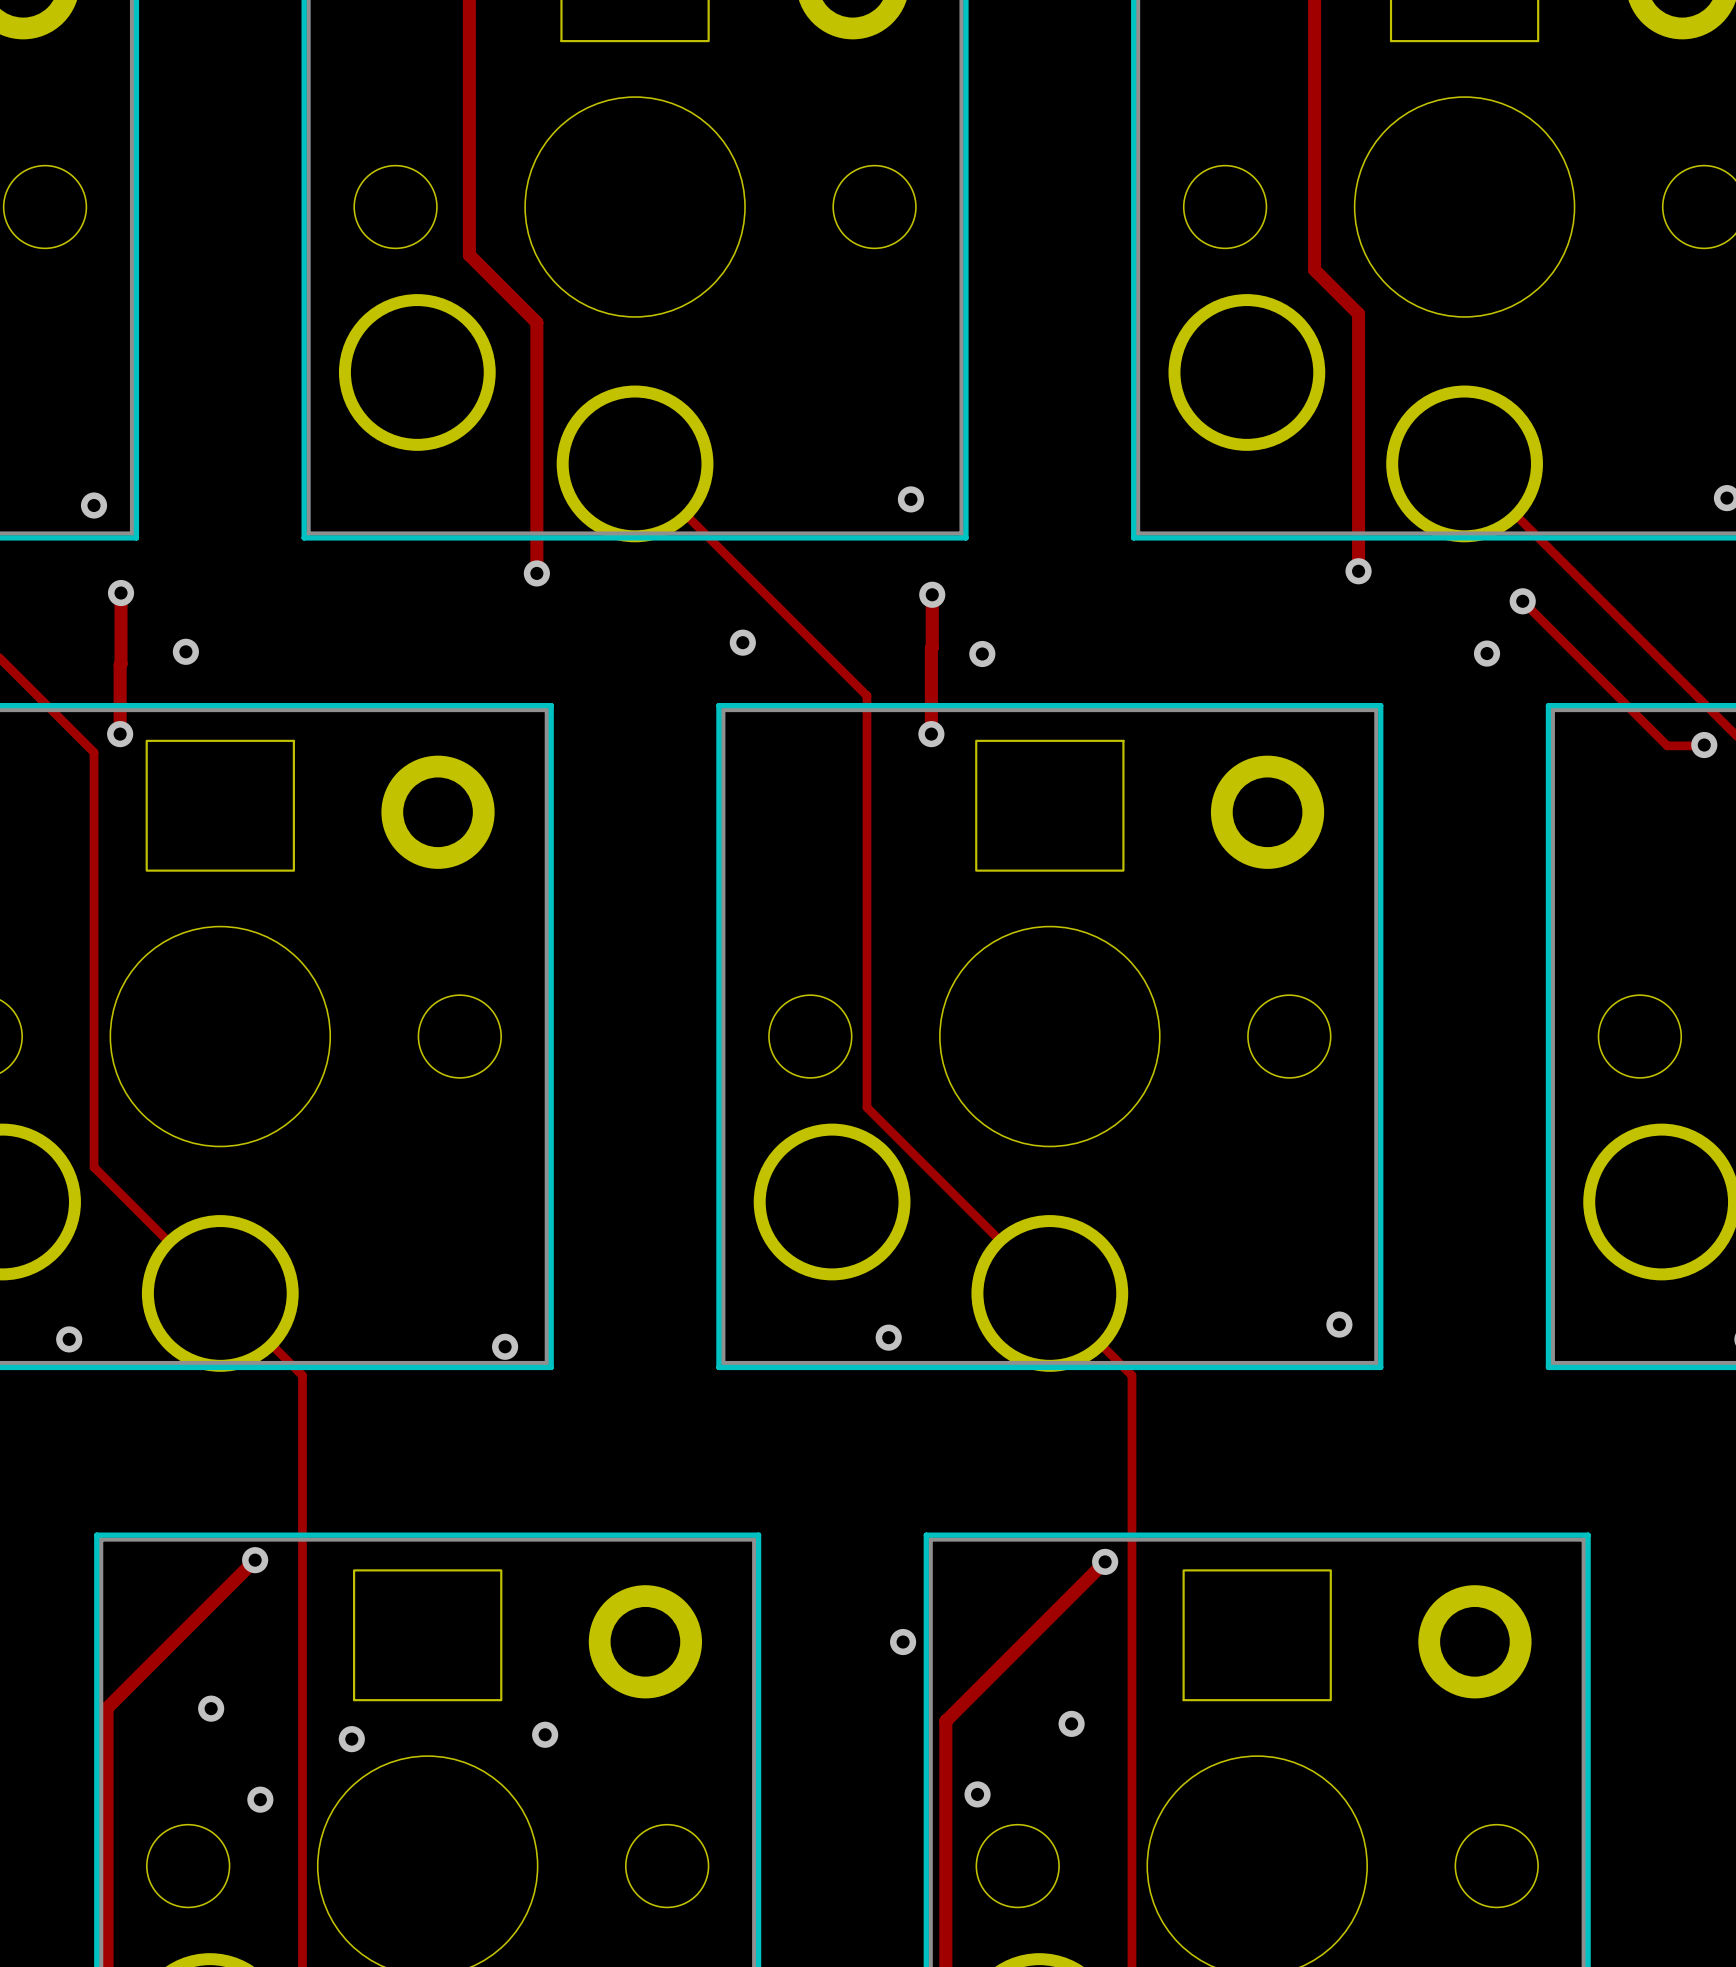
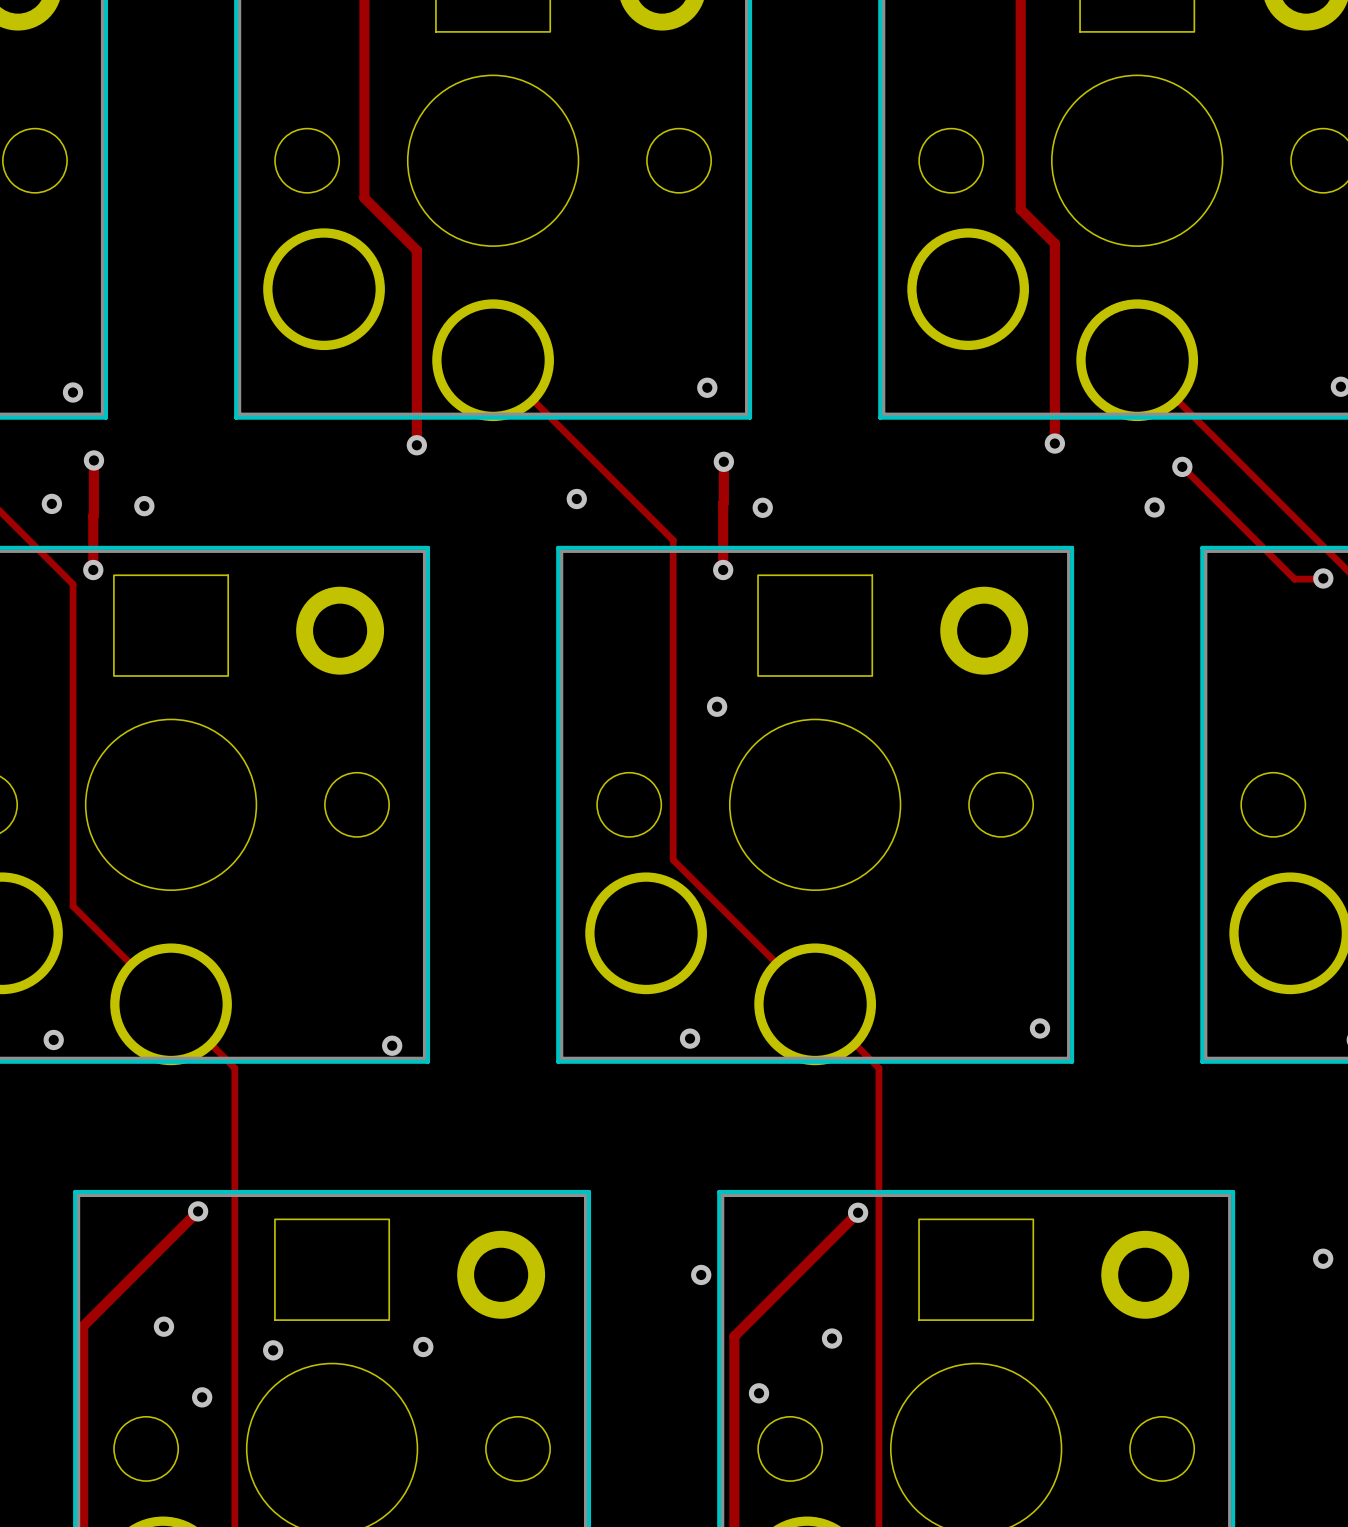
via: none -> (51, 503)
via: none -> (717, 706)
via: none -> (1323, 1258)

